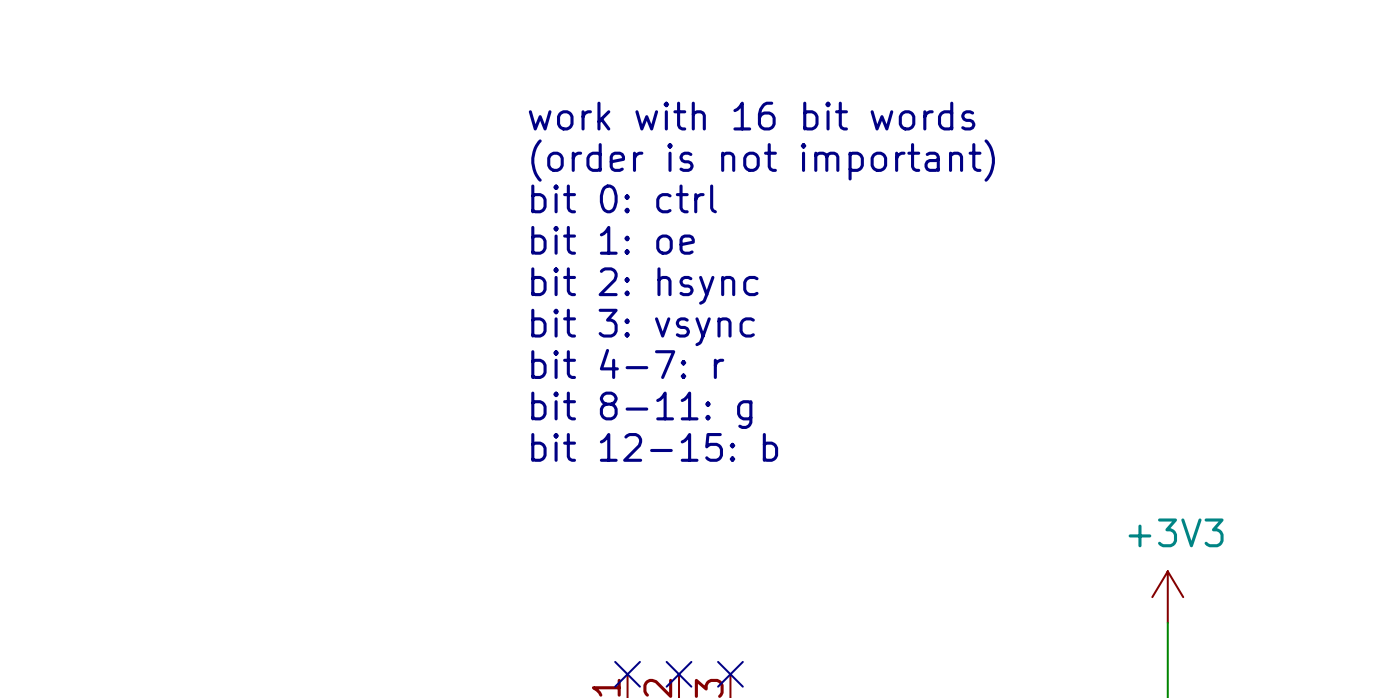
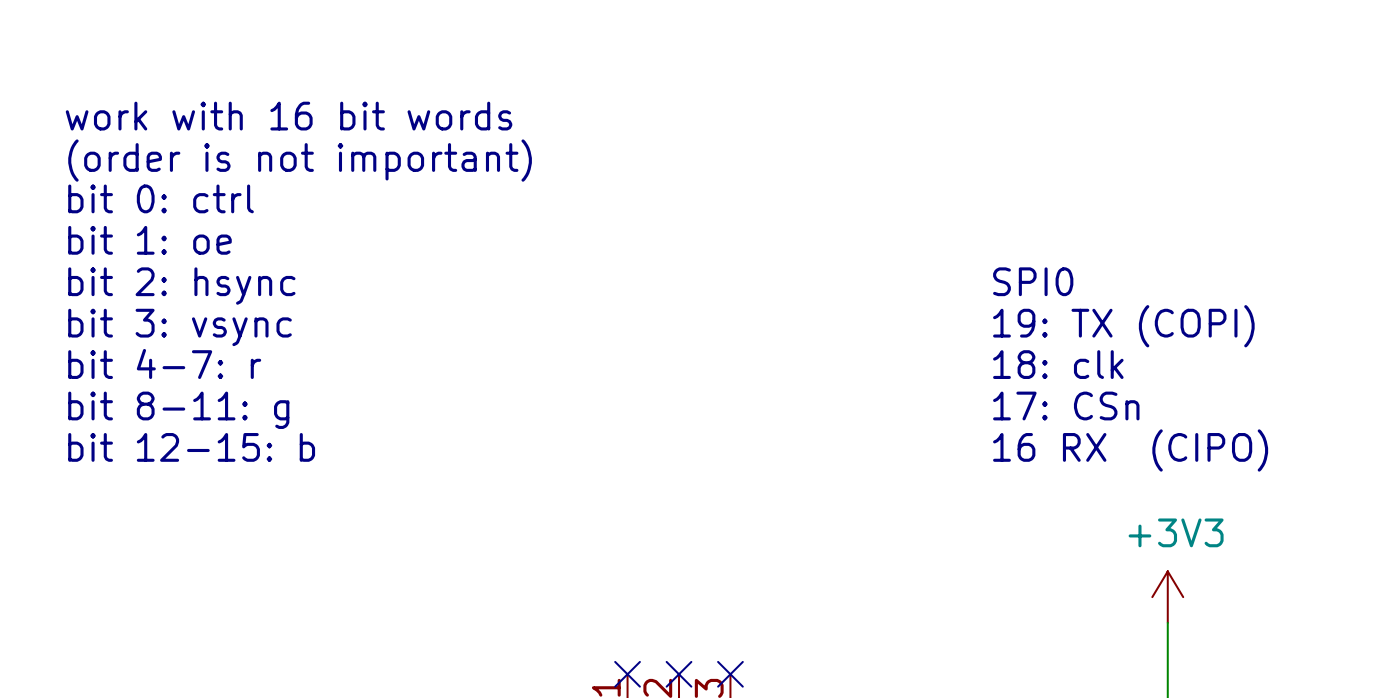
text position: work with 16 bit words (752, 116) -> work with 16 bit words (289, 116)
text position: (order is not important) (763, 160) -> (order is not important) (300, 160)
text position: bit 0: ctrl (624, 198) -> bit 0: ctrl (161, 198)
text position: bit 1: oe (613, 240) -> bit 1: oe (149, 240)
text: none -> SPI0 (1033, 281)
text position: bit 2: hsync (644, 286) -> bit 2: hsync (181, 286)
text: none -> 19: TX (COPI) (1123, 326)
text position: bit 3: vsync (643, 327) -> bit 3: vsync (180, 327)
text position: bit 4-7: r (627, 363) -> bit 4-7: r (164, 363)
text: none -> 18: clk (1058, 364)
text: none -> 17: CSn (1066, 406)
text position: bit 8-11: g (641, 410) -> bit 8-11: g (178, 410)
text position: bit 12-15: b (654, 447) -> bit 12-15: b (191, 447)
text: none -> 16 RX (CIPO) (1130, 450)

